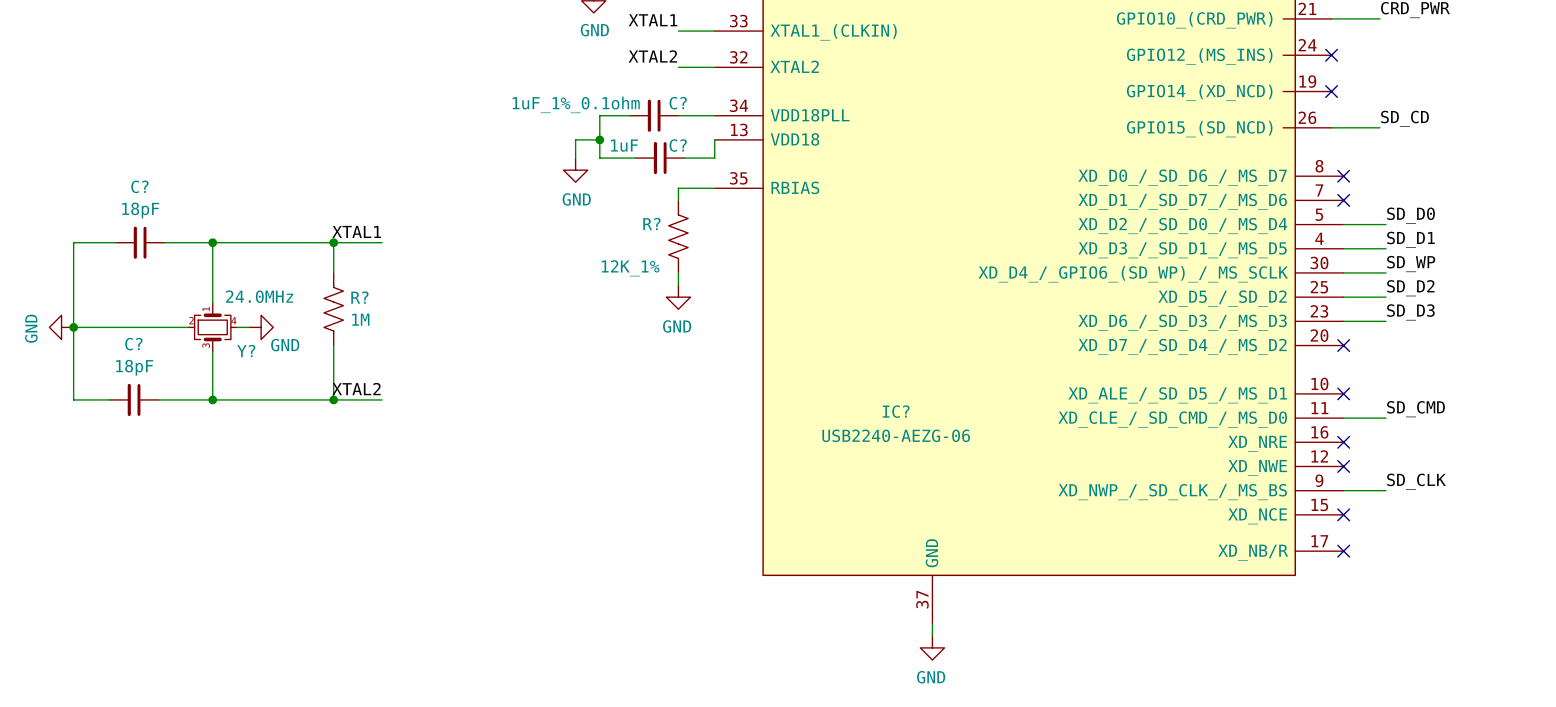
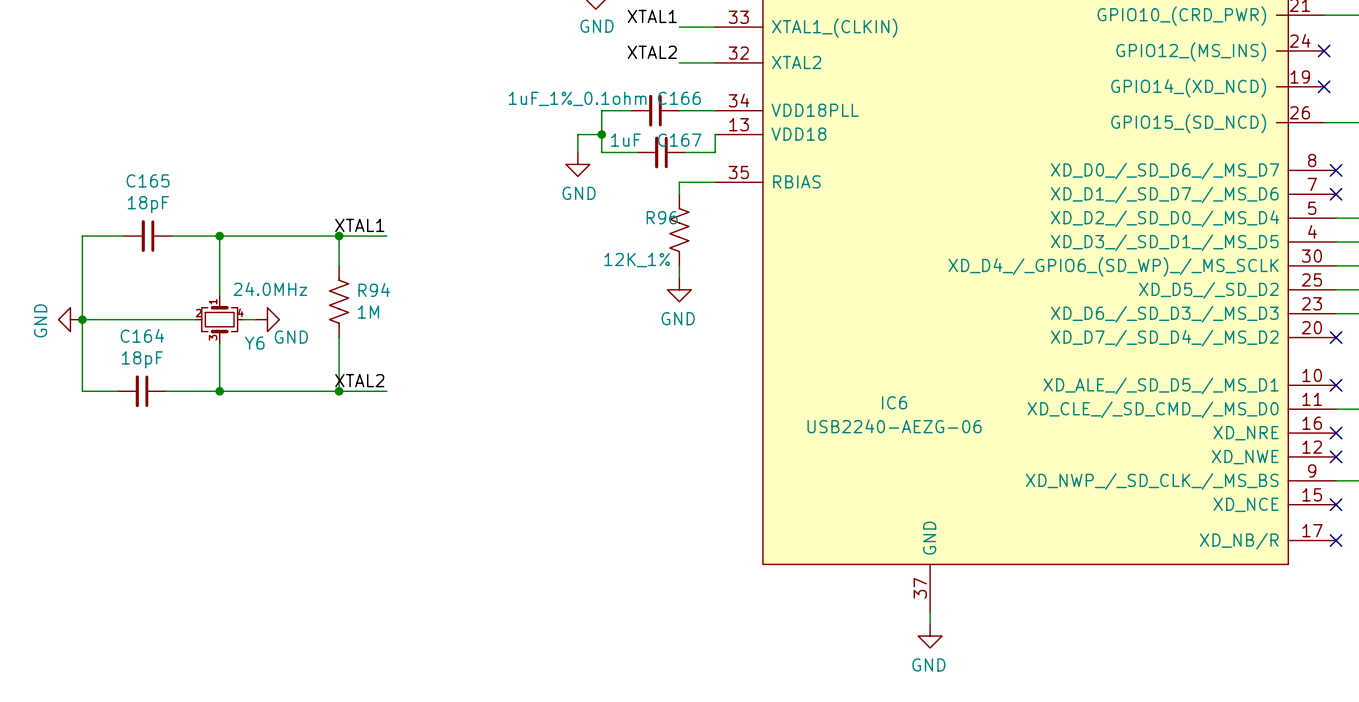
C? name: C? (678, 103) -> C166 (679, 98)
C? name: C? (678, 145) -> C167 (679, 140)
C? name: C? (139, 186) -> C165 (148, 180)
R? name: R? (651, 224) -> R96 (662, 217)
R? name: R? (359, 297) -> R94 (374, 290)
C? name: C? (133, 344) -> C164 (142, 335)
Y? name: Y? (246, 351) -> Y6 (254, 343)
IC? name: IC? (896, 411) -> IC6 (894, 402)

